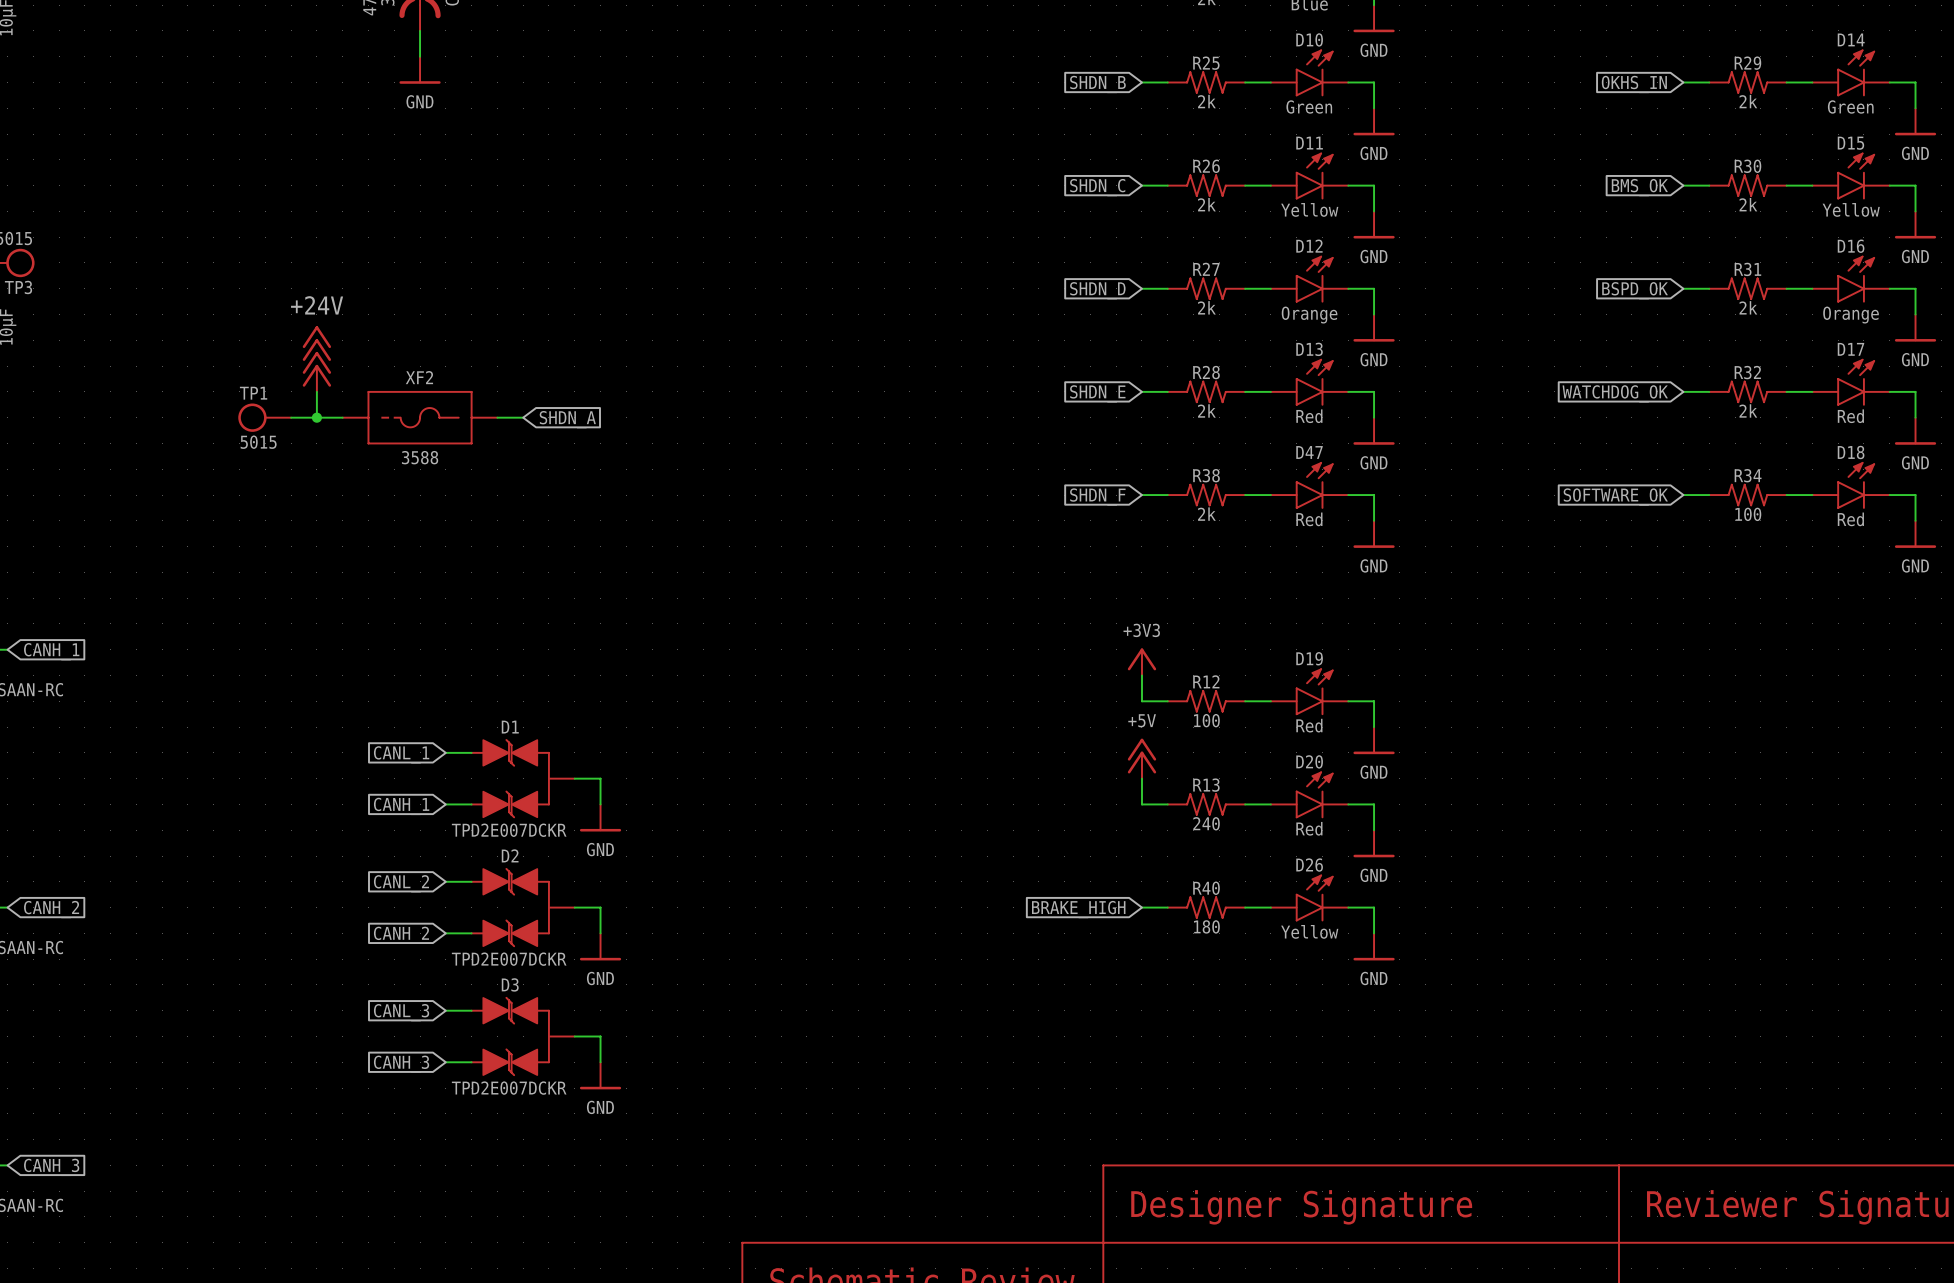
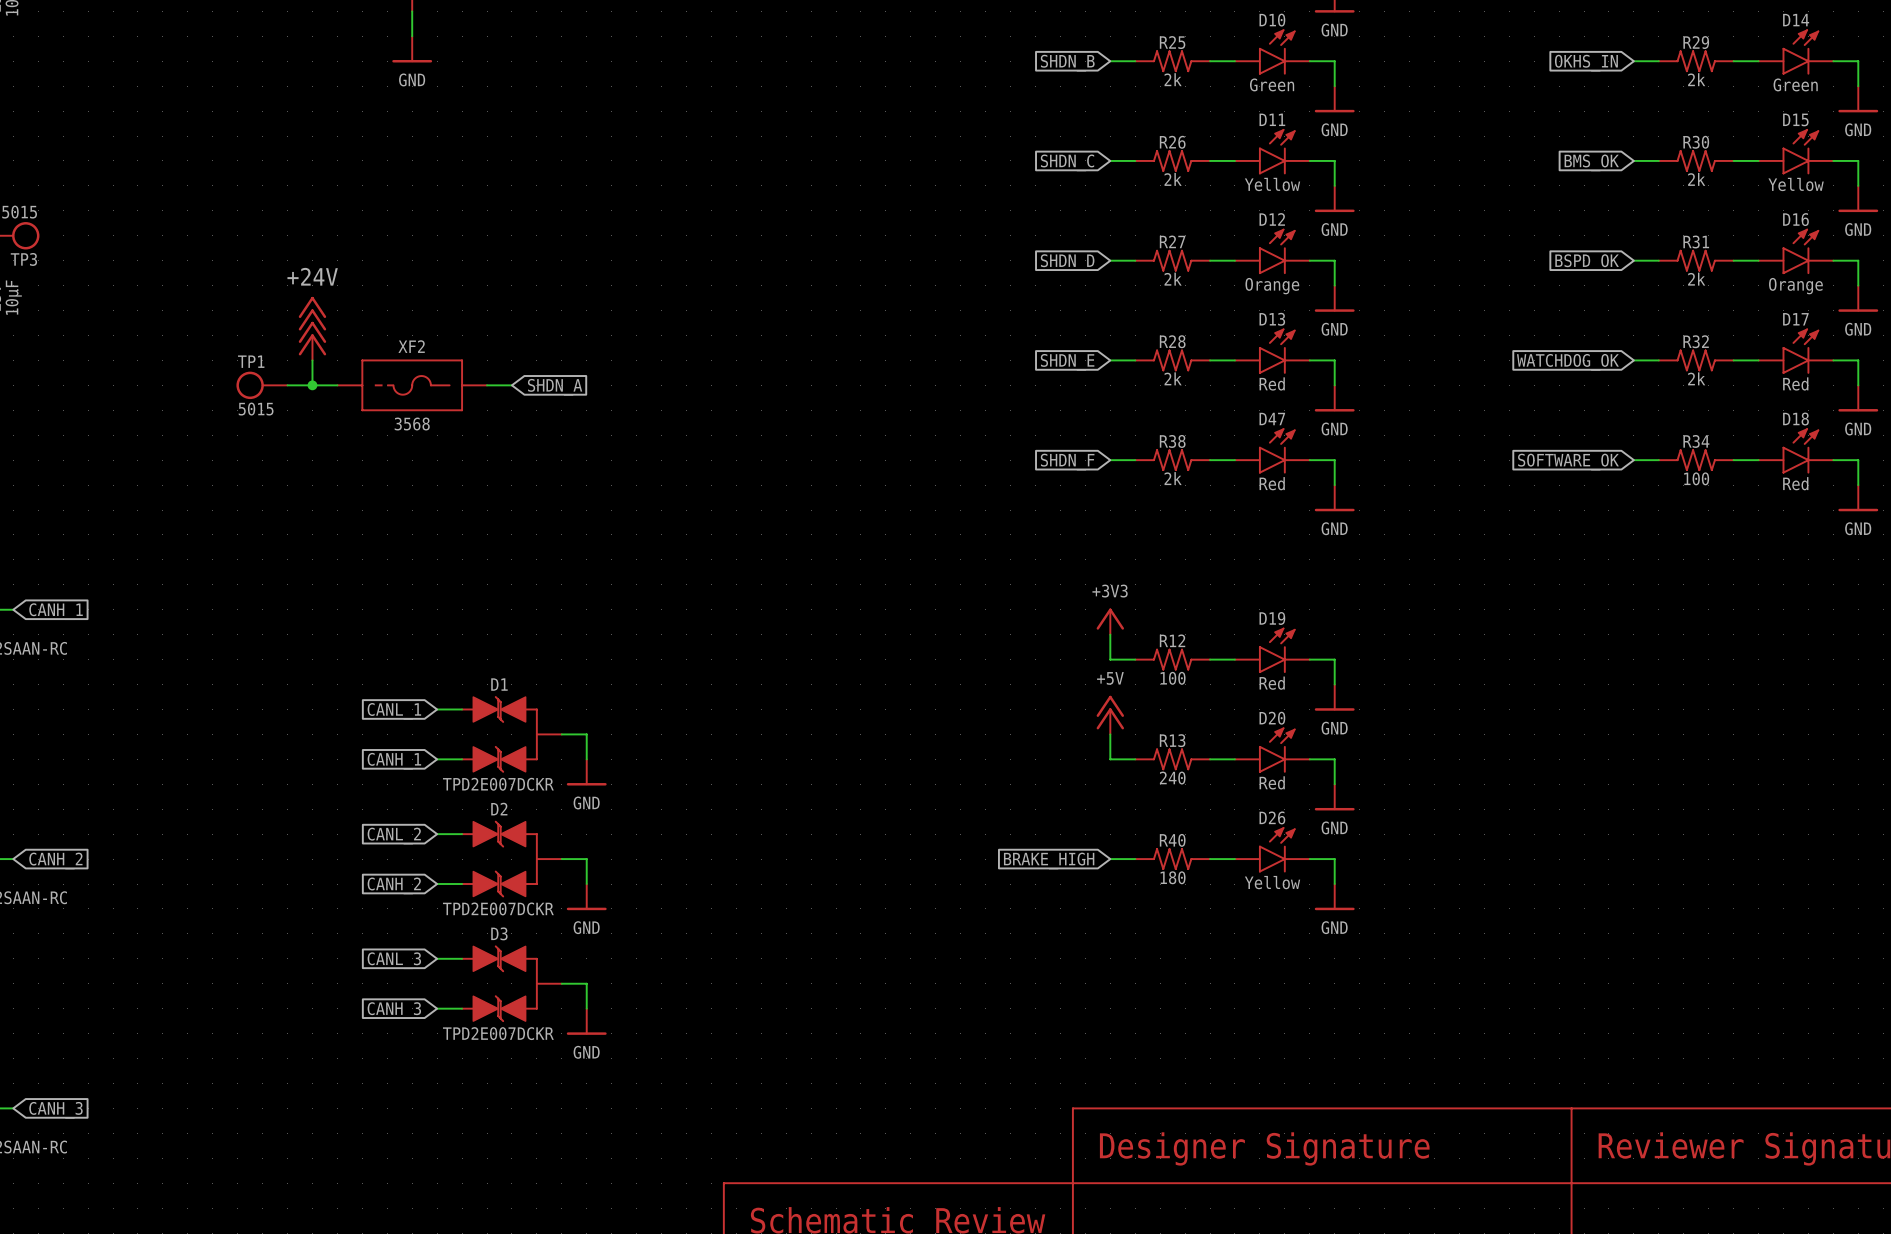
XF2 text: 3588 (420, 457) -> 3568 (412, 424)

